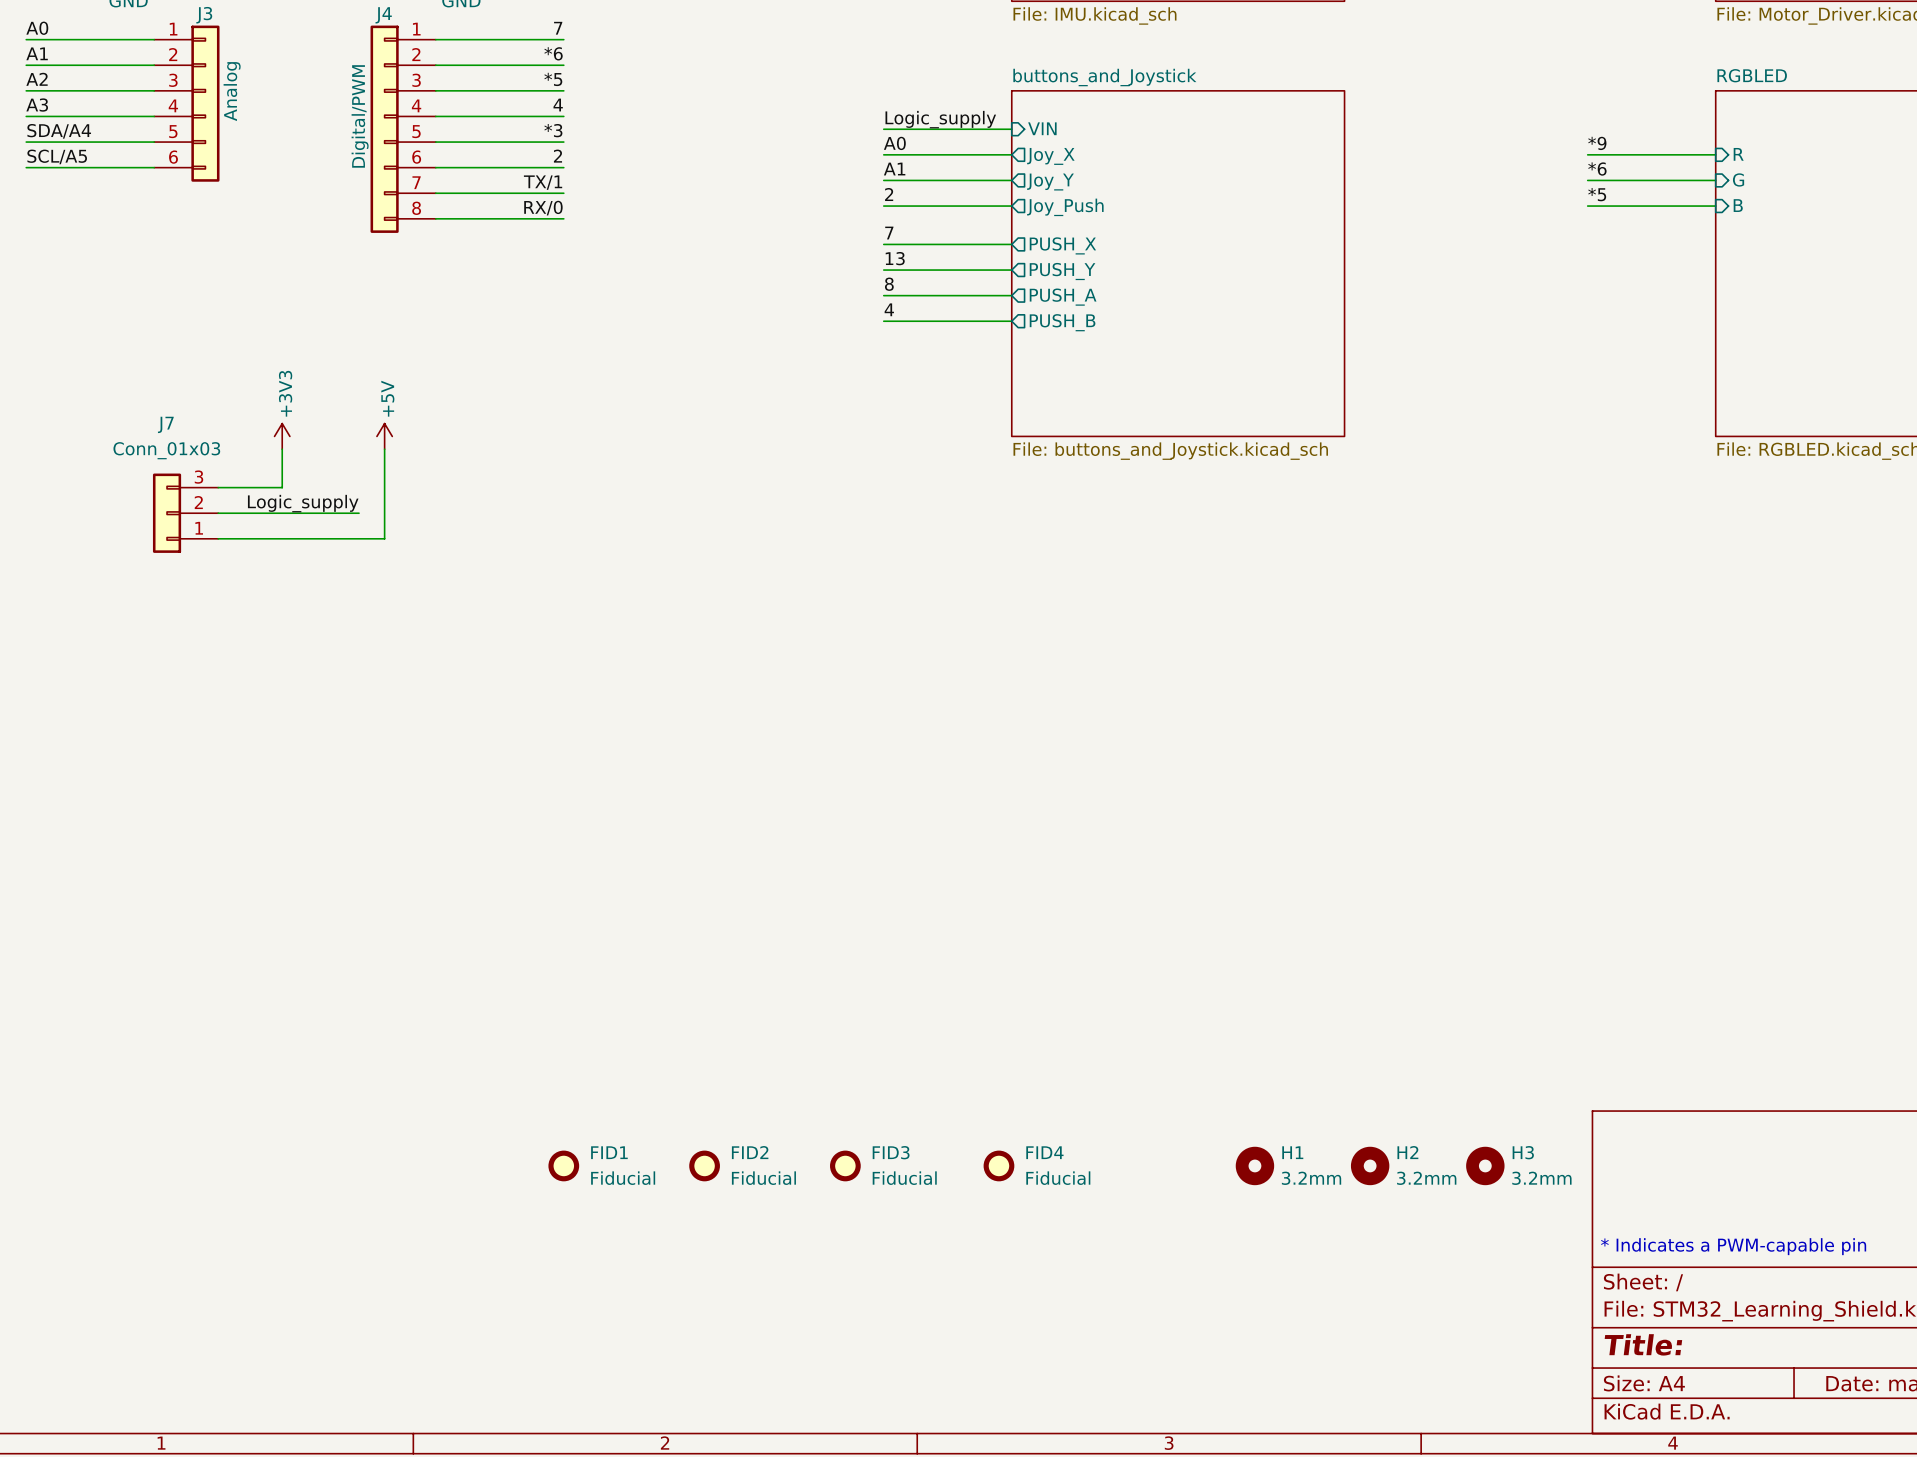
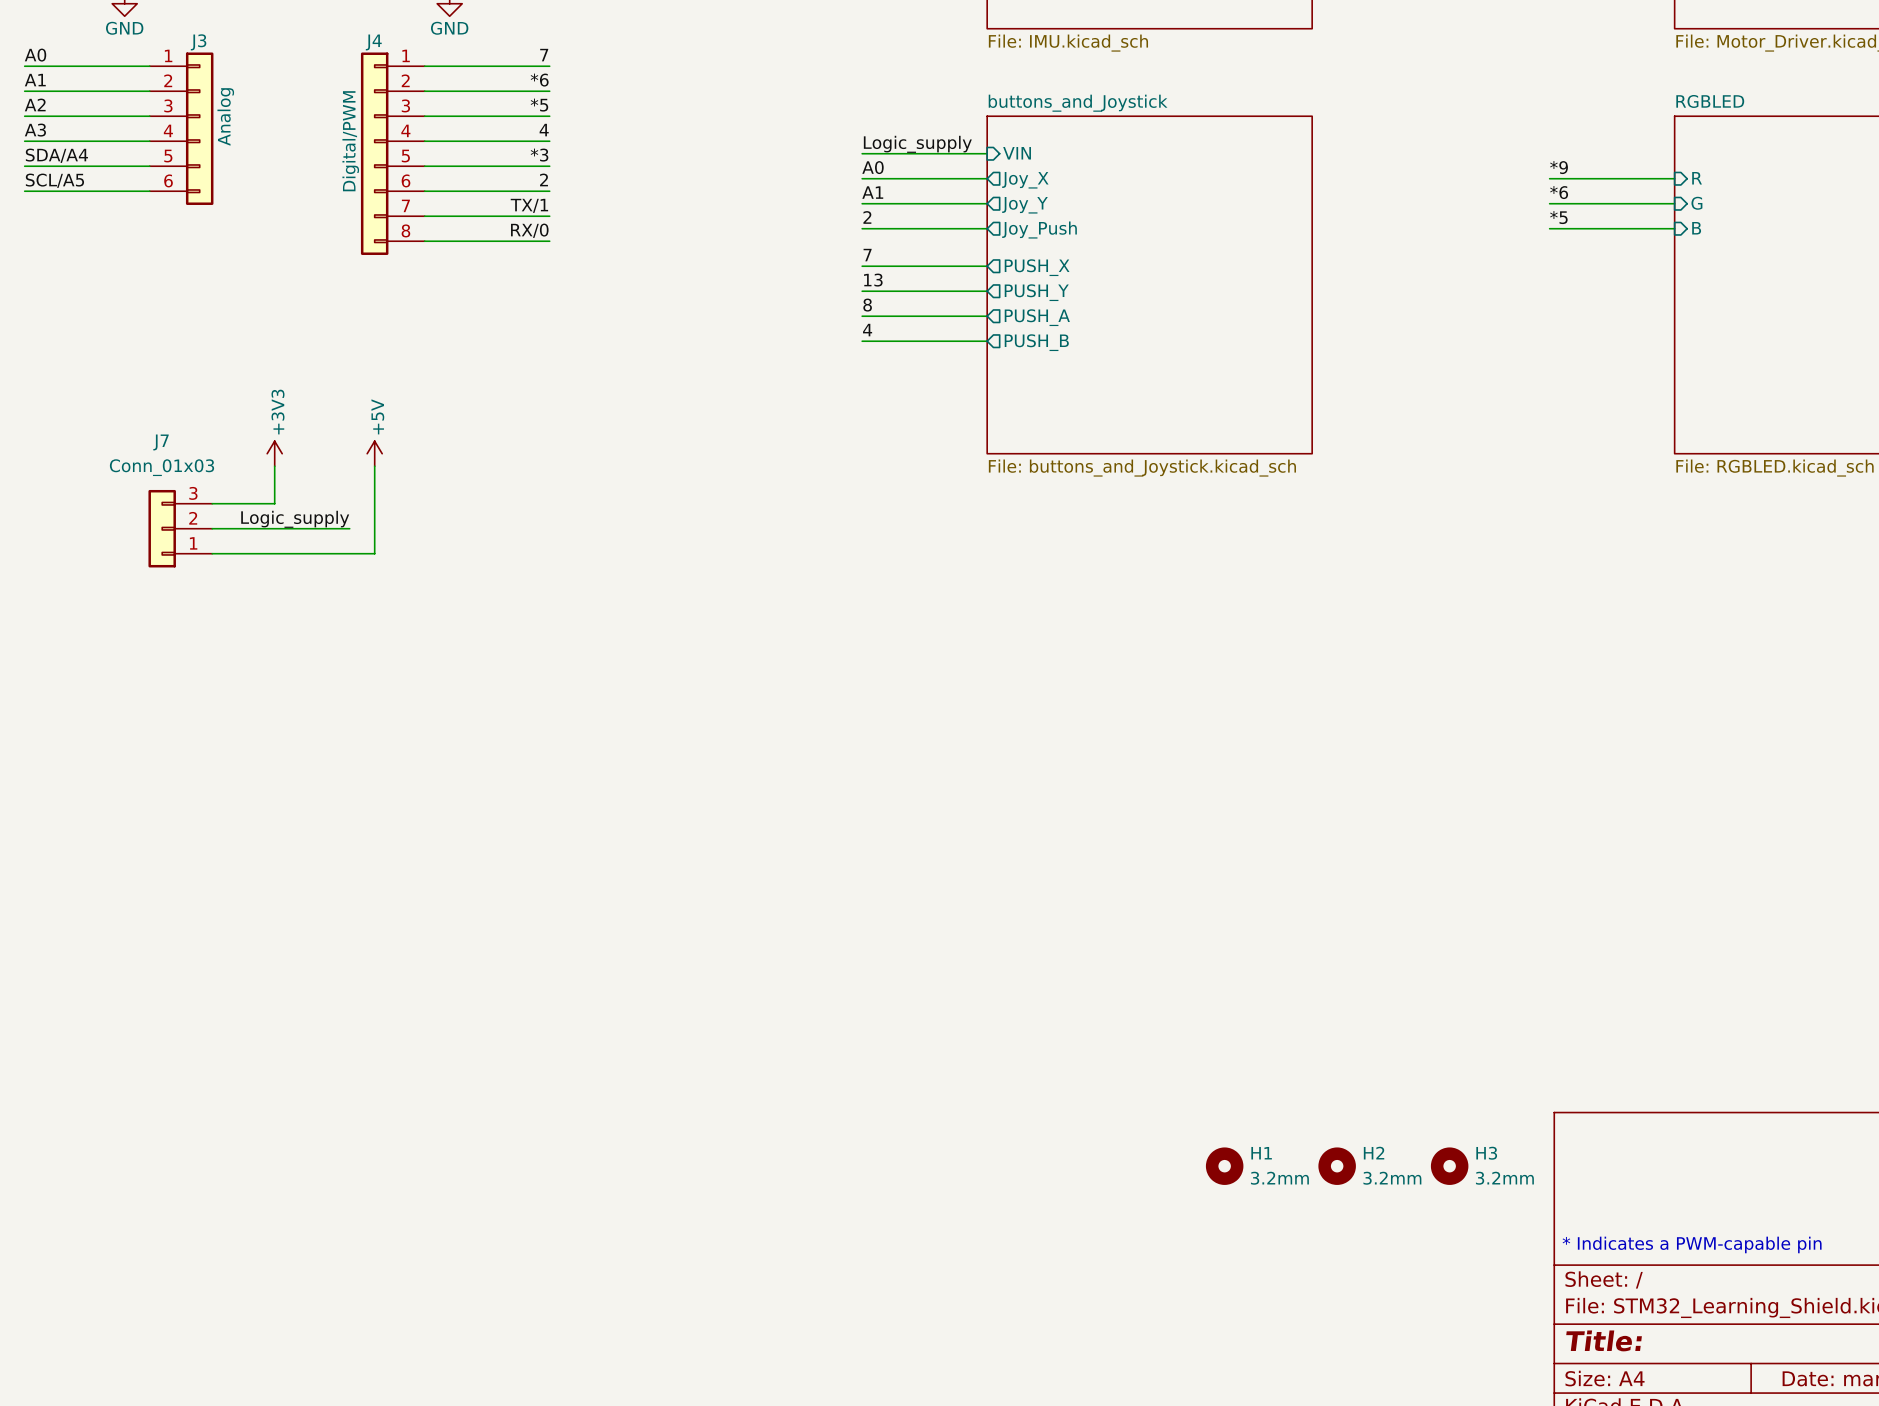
FID1: Fiducial (563, 1165) -> none
FID2: Fiducial (704, 1165) -> none
FID3: Fiducial (845, 1165) -> none
FID4: Fiducial (998, 1165) -> none

